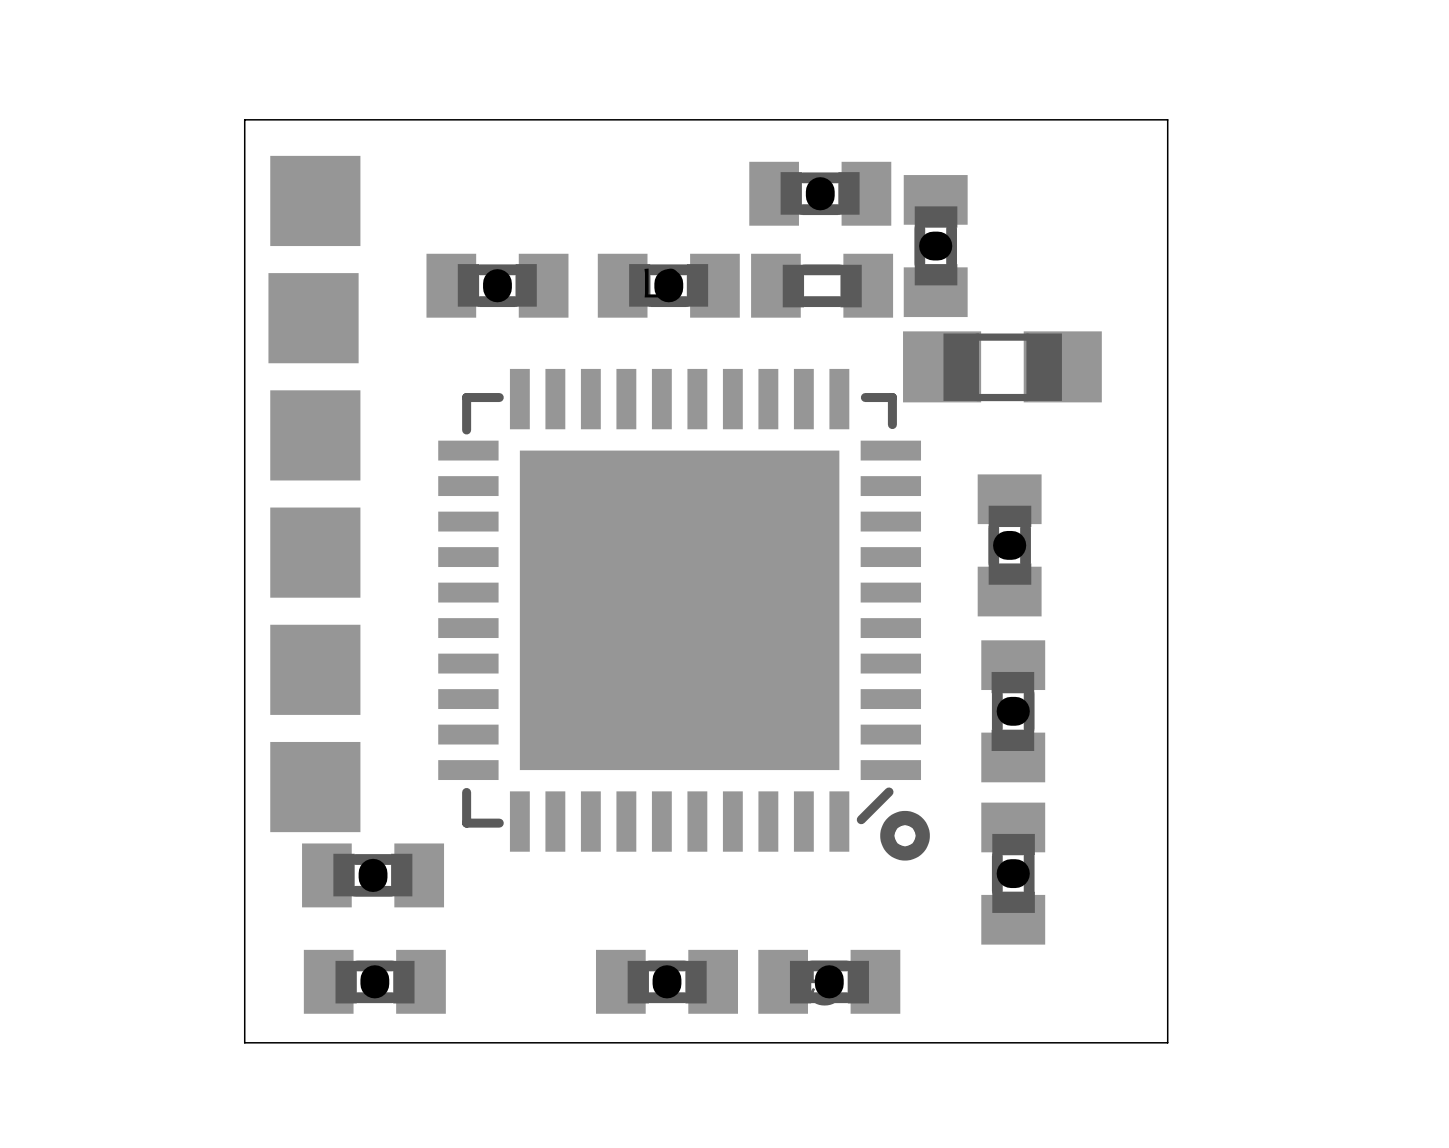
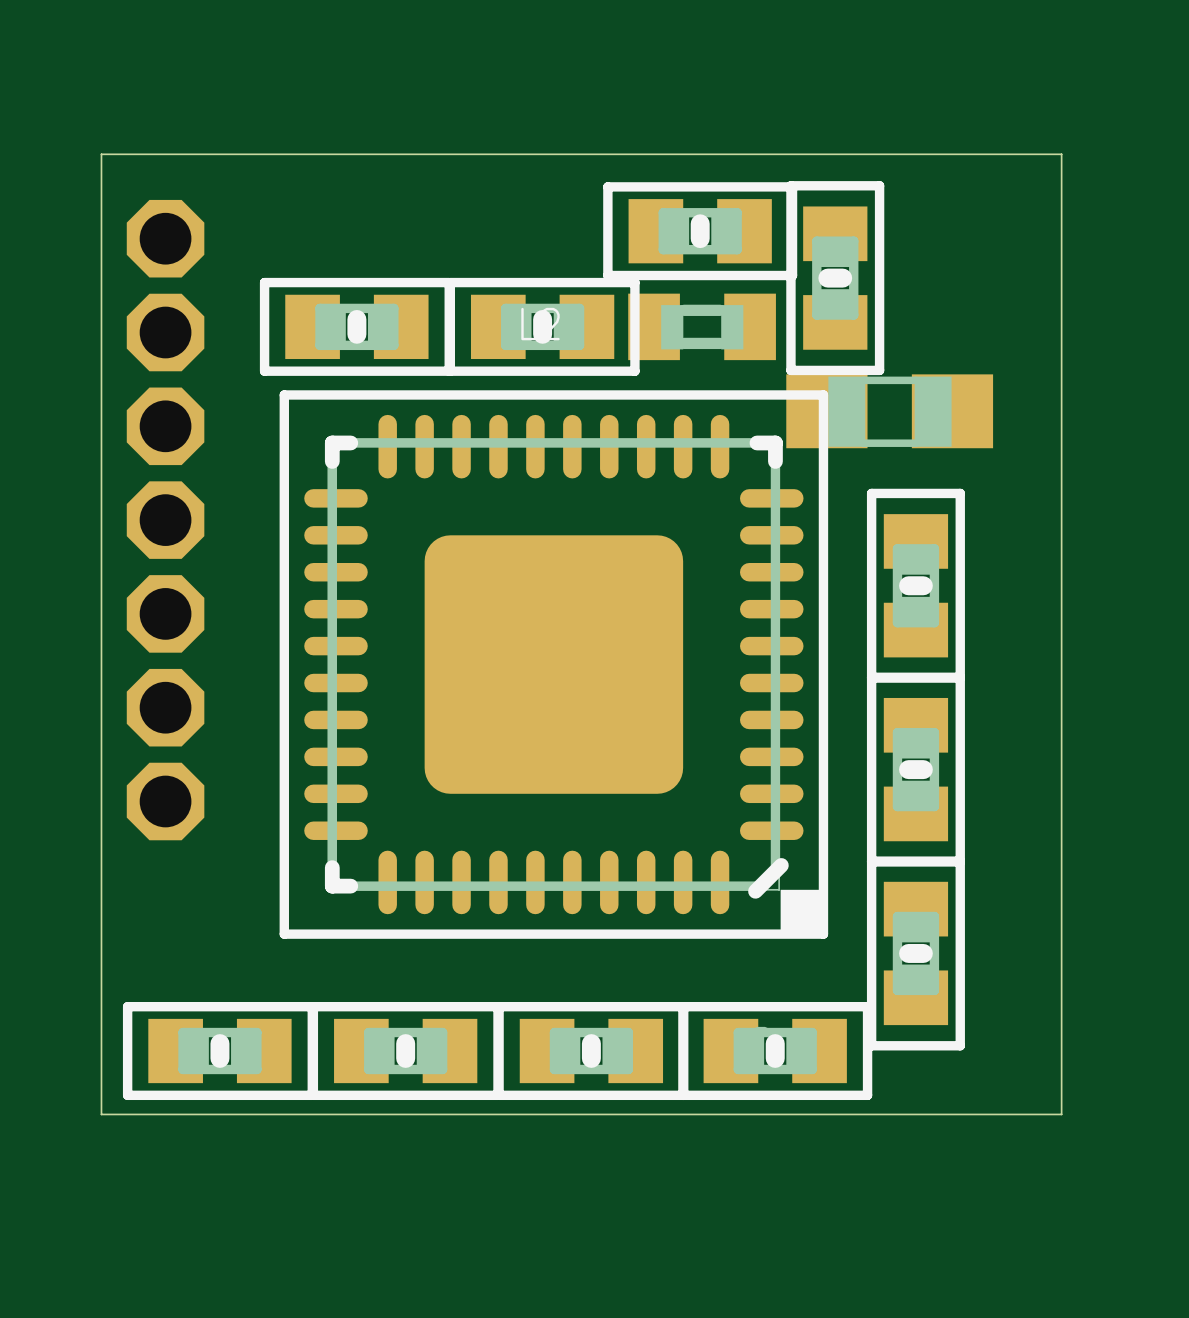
part footprint: [270, 155, 361, 247] -> [126, 199, 205, 278]
part footprint: [749, 161, 892, 226] -> [603, 182, 798, 281]
part footprint: [903, 175, 968, 318] -> [786, 181, 885, 376]
part footprint: [426, 253, 569, 318] -> [259, 277, 454, 376]
part footprint: [597, 253, 740, 318] -> [445, 277, 640, 376]
part footprint: [268, 273, 359, 364] -> [126, 293, 205, 372]
part footprint: [438, 368, 930, 861] -> [279, 390, 829, 939]
part: none -> (165, 426)
part: (315, 435) -> none
part: none -> (165, 520)
part footprint: [977, 474, 1042, 617] -> [866, 488, 965, 683]
part footprint: [270, 507, 361, 598] -> [126, 575, 205, 653]
part footprint: [270, 624, 361, 715] -> [126, 668, 205, 747]
part footprint: [981, 640, 1046, 783] -> [866, 672, 965, 867]
part: none -> (165, 801)
part: (315, 787) -> none
part footprint: [981, 802, 1046, 945] -> [866, 856, 965, 1051]
part: (373, 875) -> none
part footprint: [303, 949, 446, 1014] -> [122, 1002, 317, 1101]
part footprint: [595, 949, 738, 1014] -> [494, 1002, 689, 1101]
part footprint: [758, 949, 901, 1014] -> [678, 1002, 873, 1101]
part: none -> (405, 1051)

